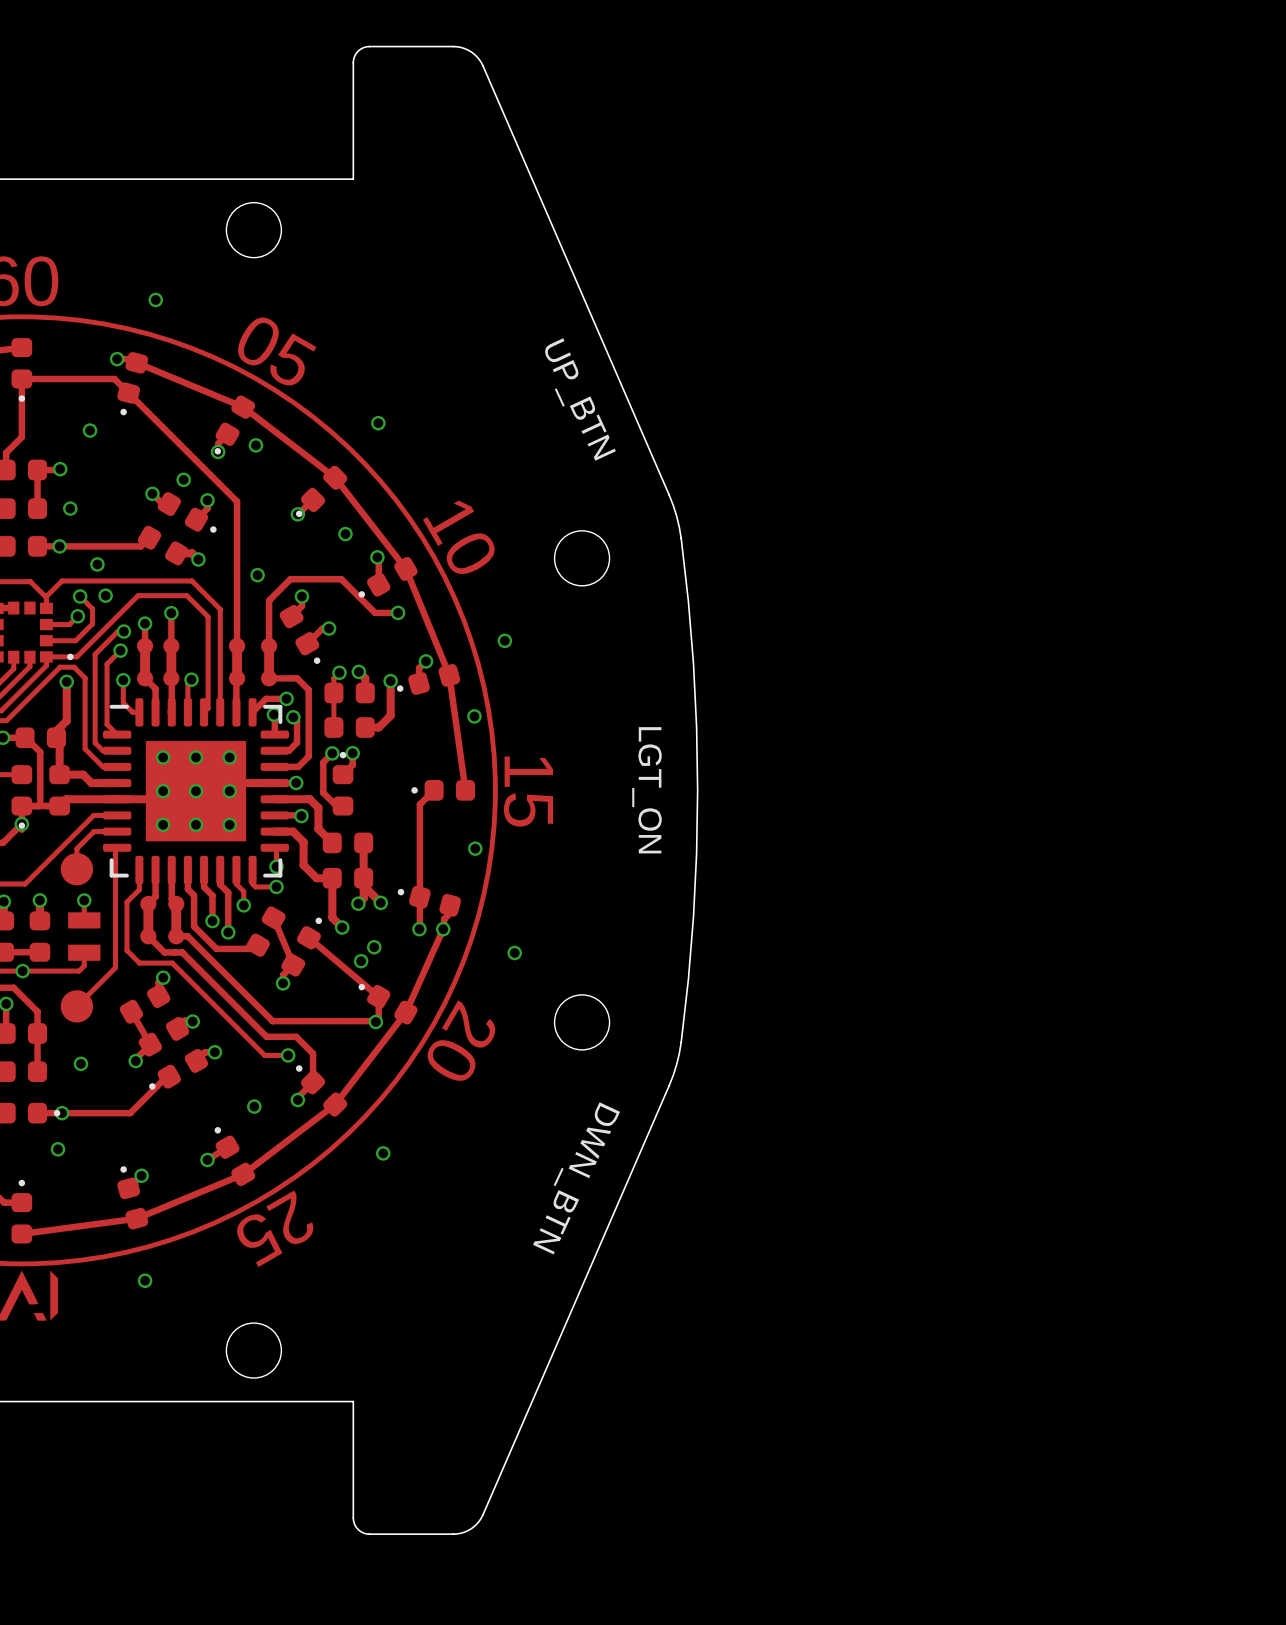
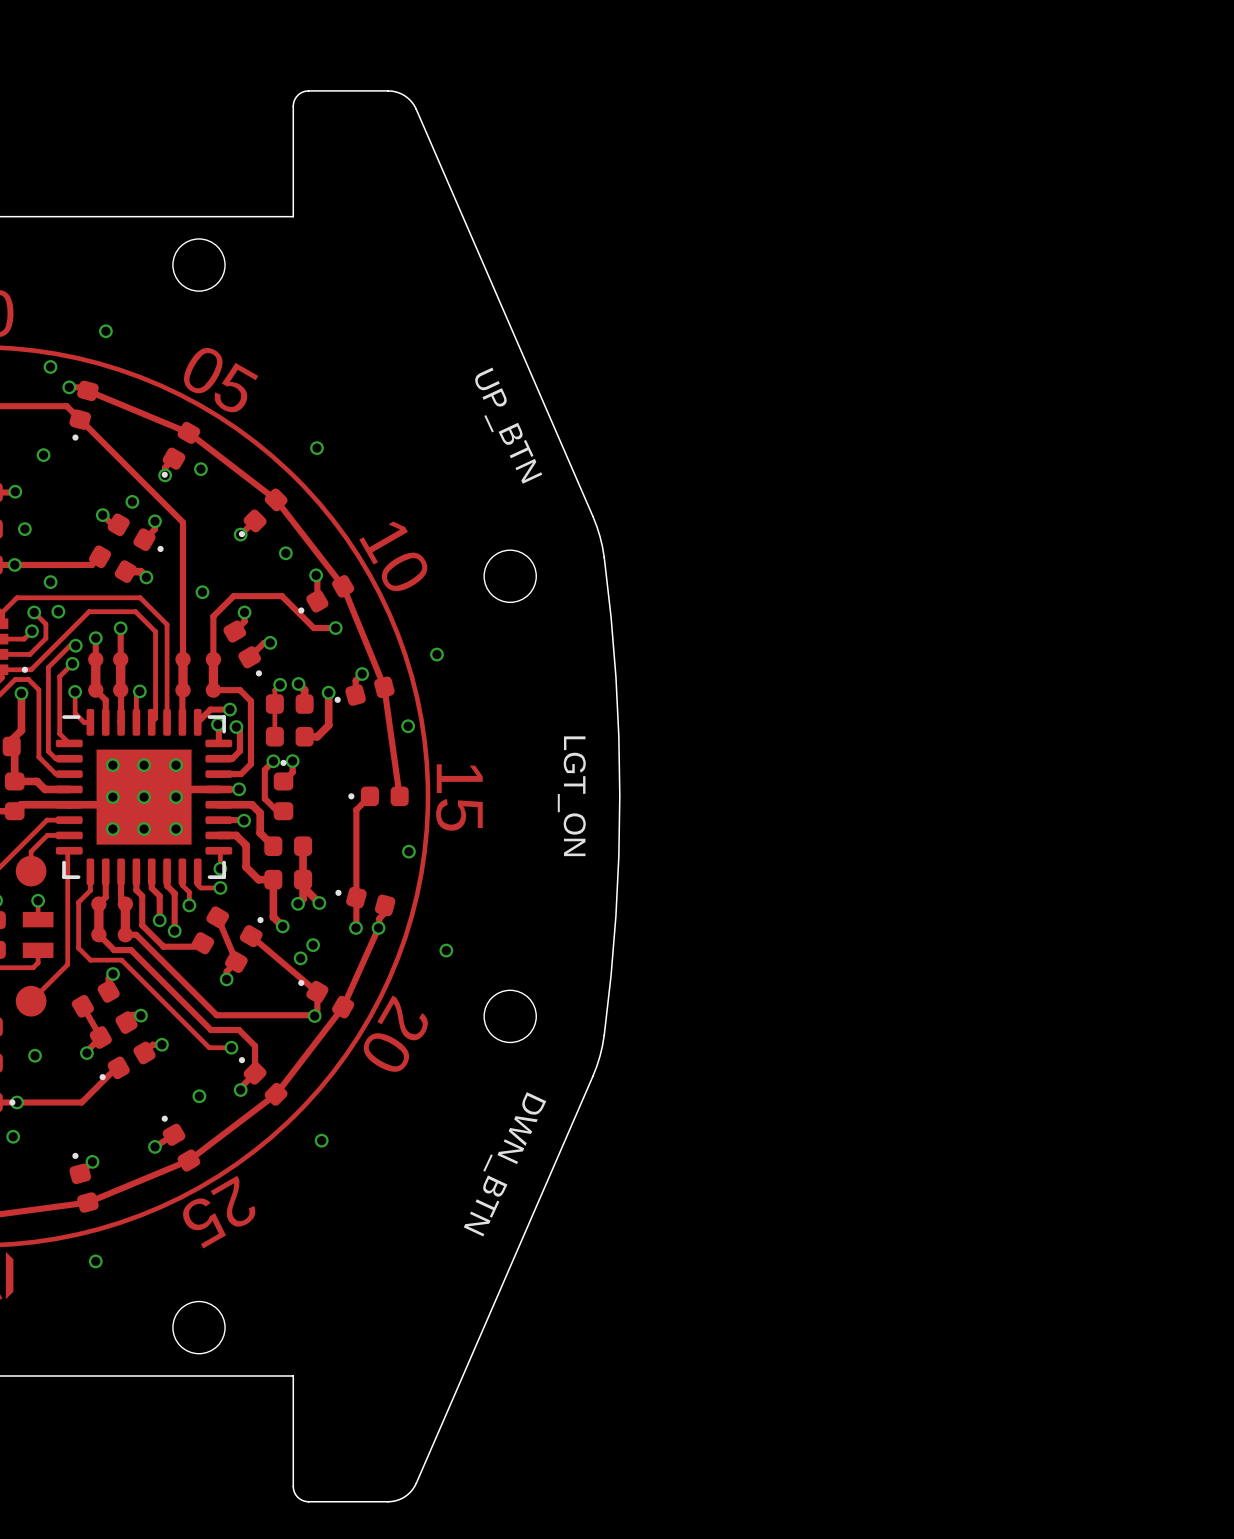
via: none -> (50, 366)

